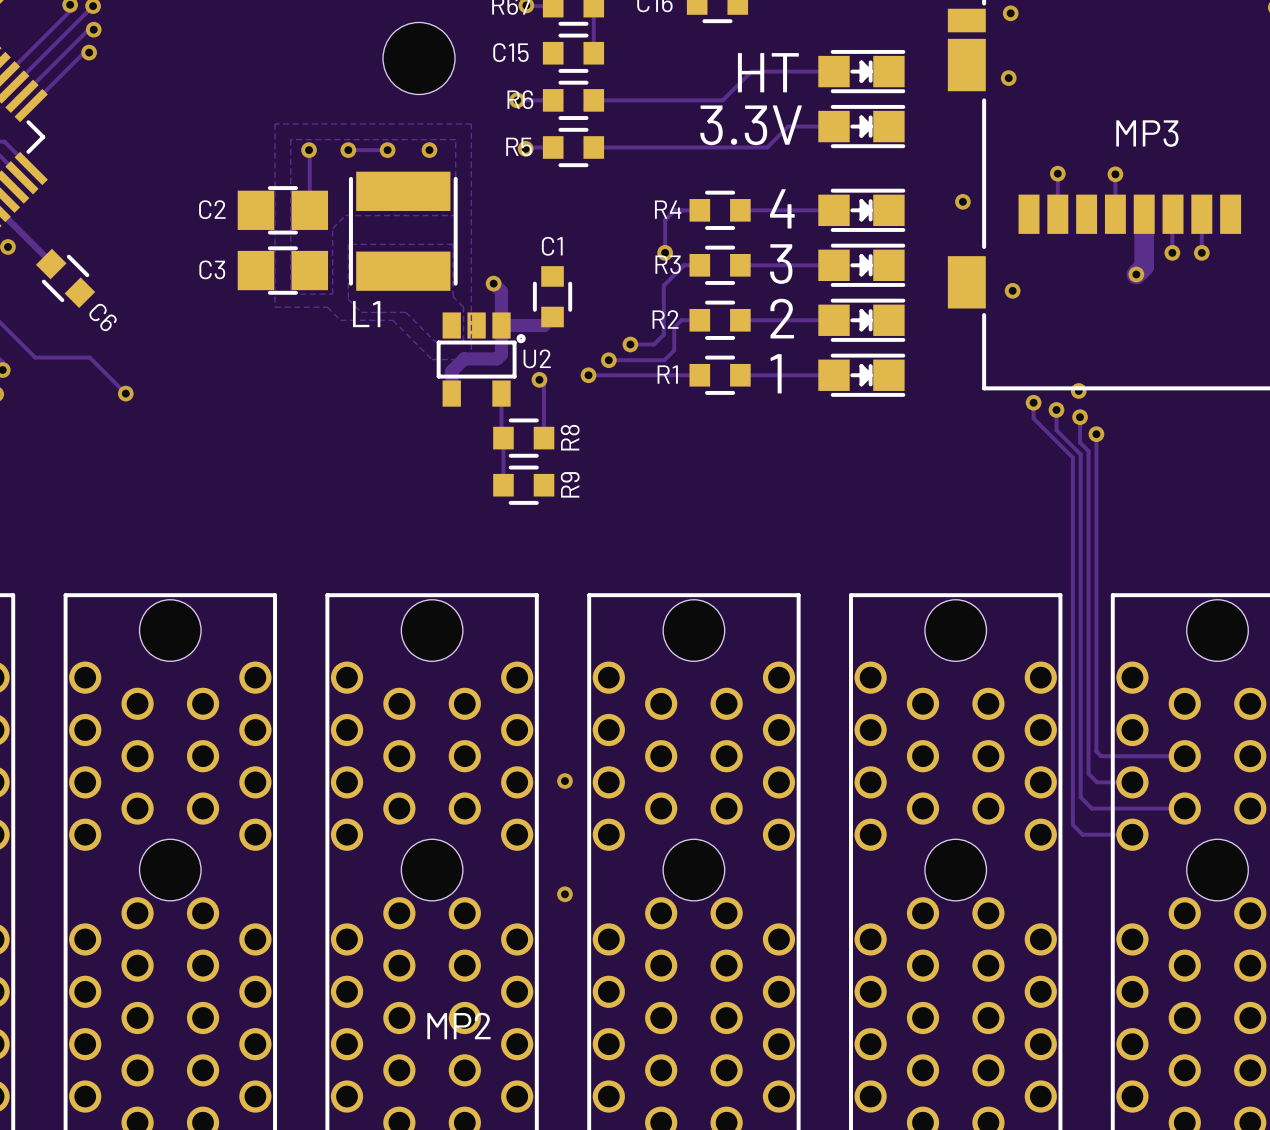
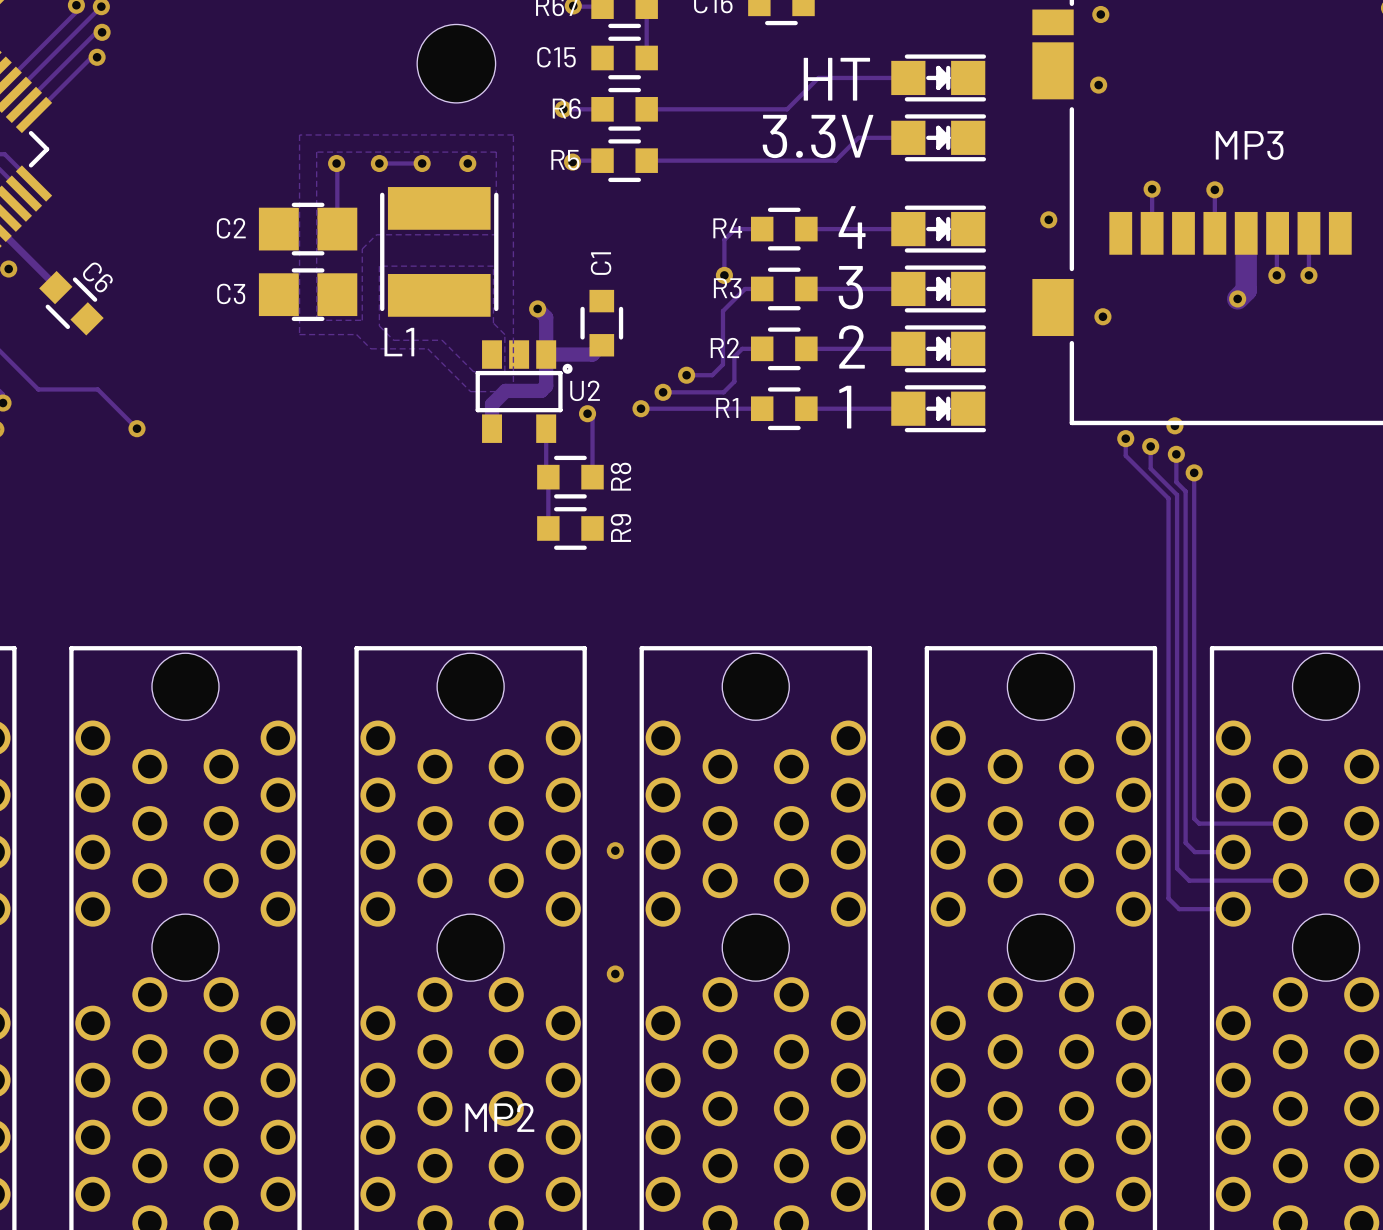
C1 name rotation: 0° (552, 246) -> 90° counterclockwise (601, 263)
C6 name position: C6 (102, 317) -> C6 (97, 277)

